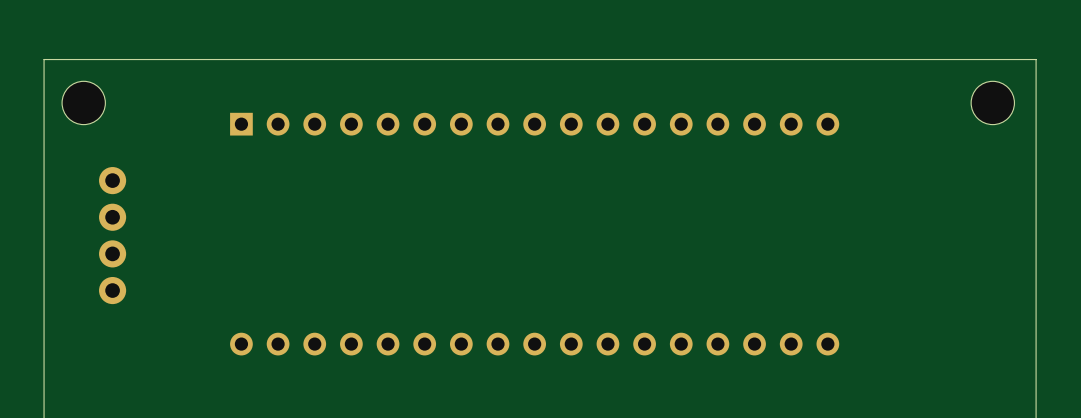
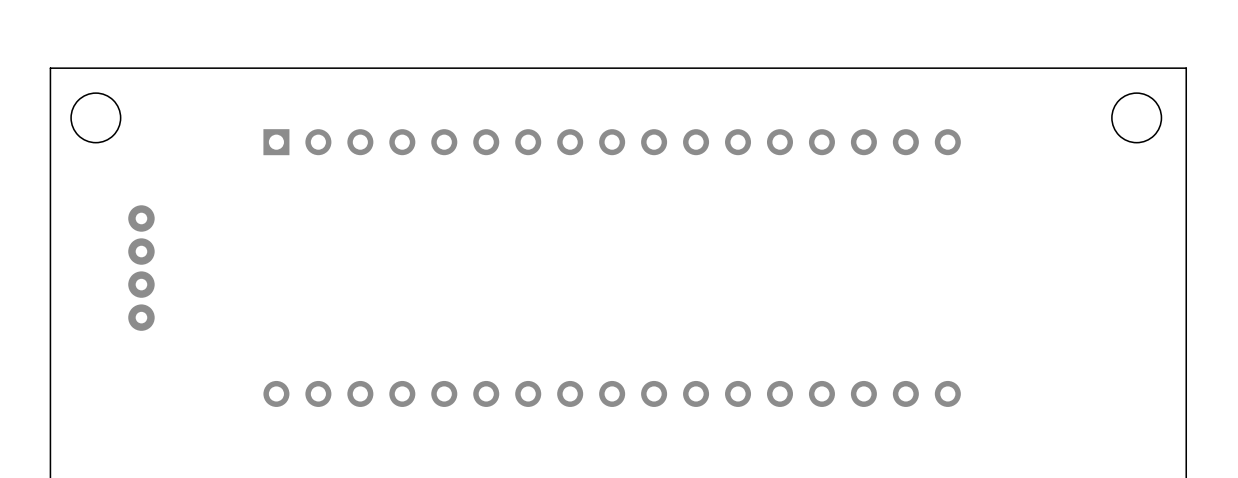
part footprint: [99, 167, 127, 305] -> [128, 205, 155, 331]

